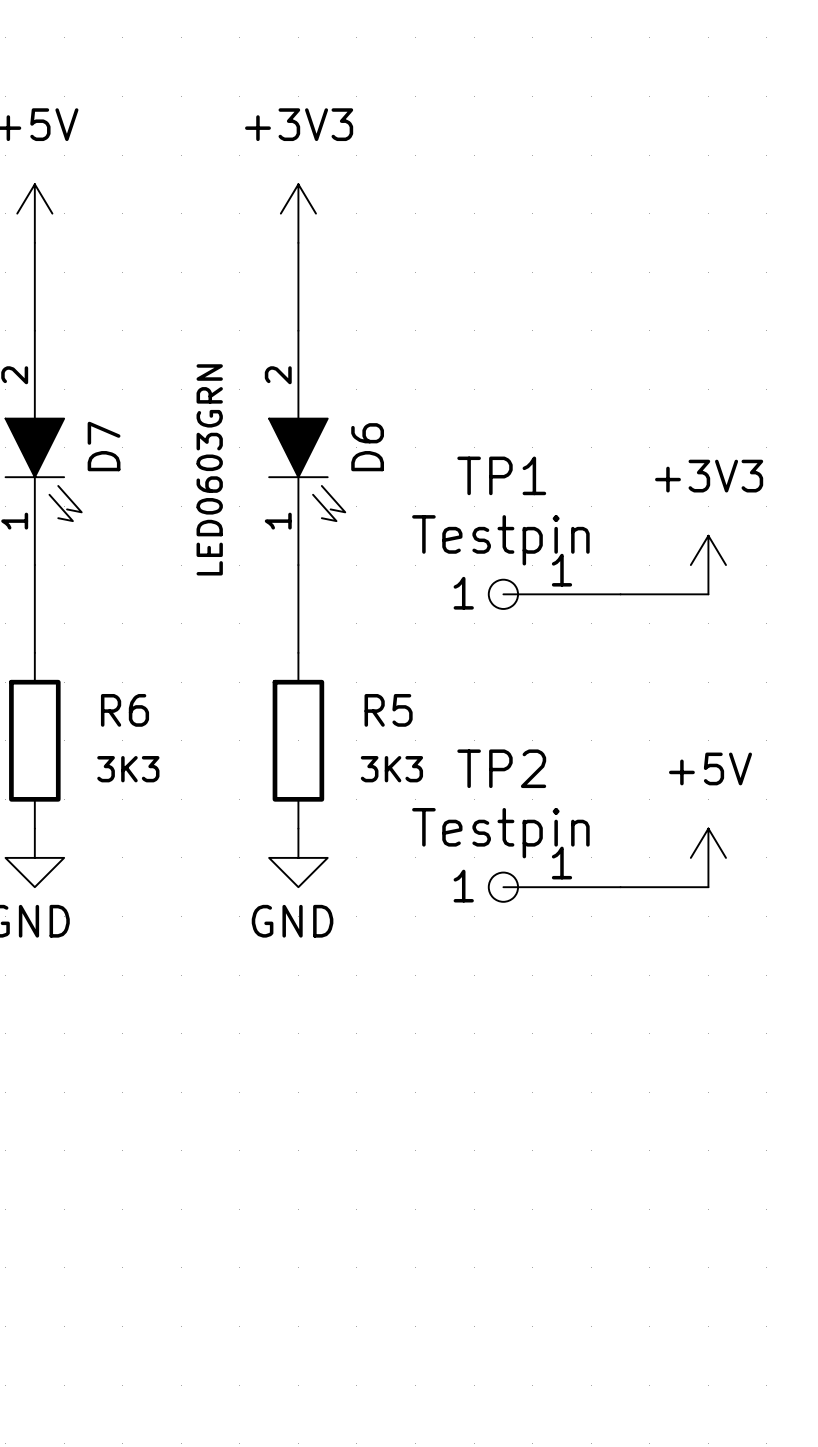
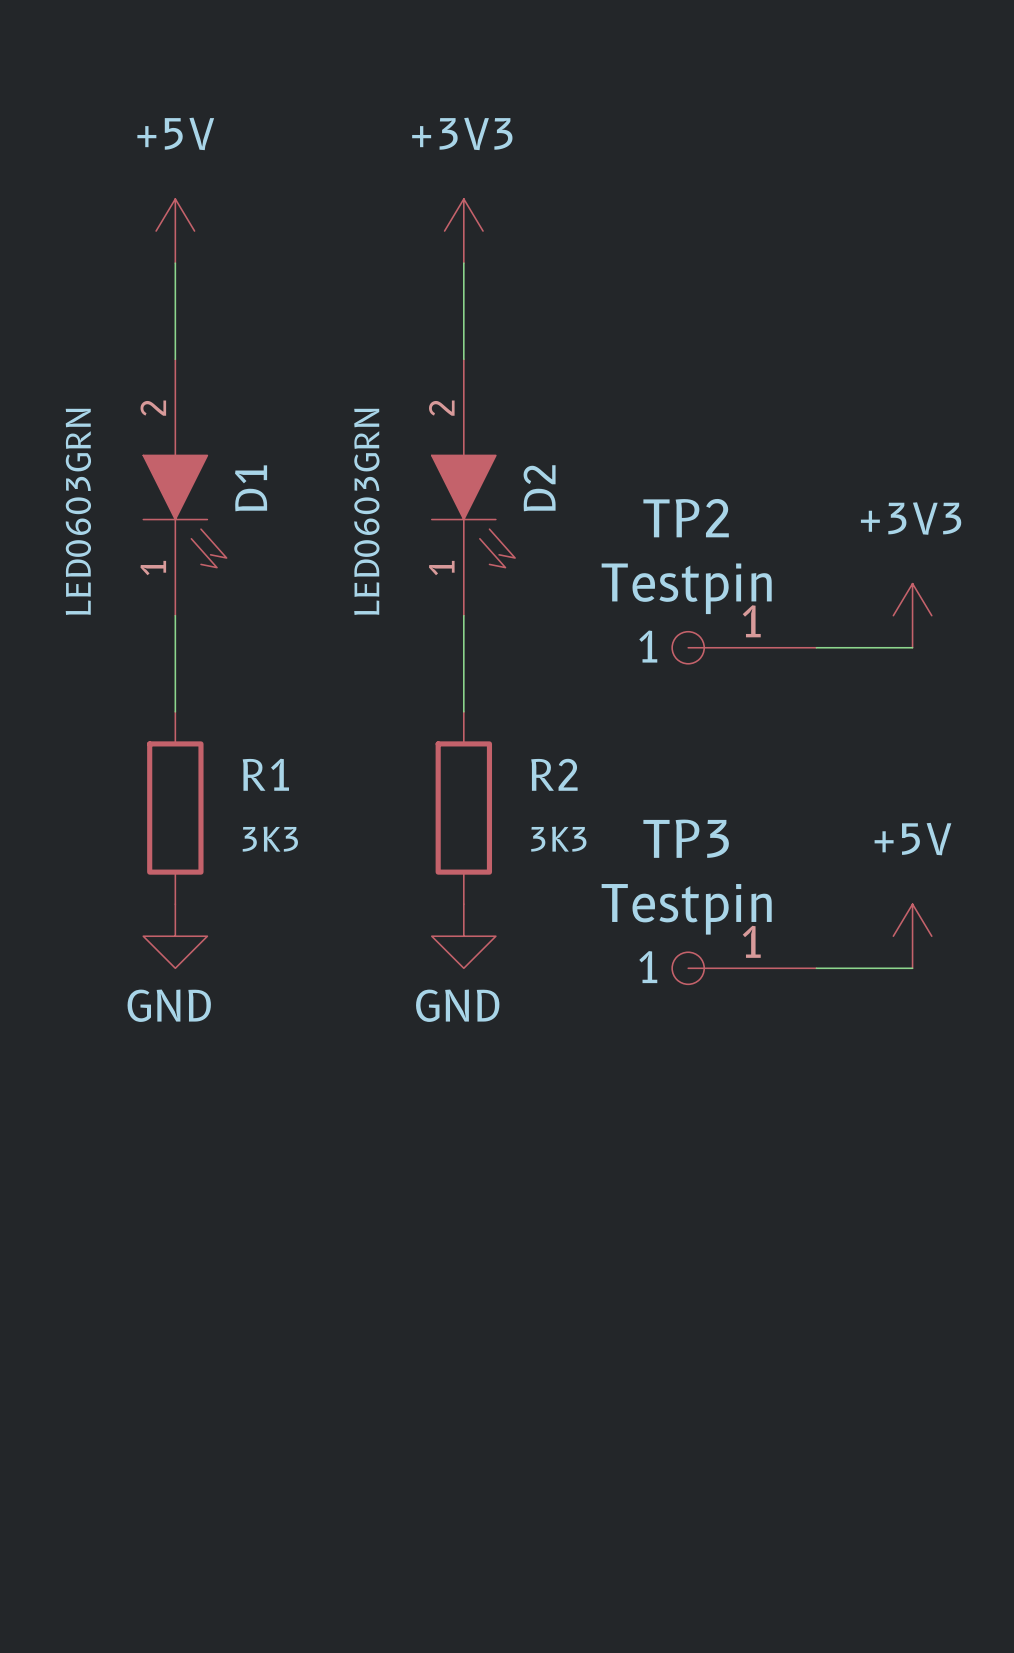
D7 name: D7 (104, 446) -> D1 (251, 488)
D6 name: D6 (367, 447) -> D2 (539, 488)
TP1 name: TP1 (501, 475) -> TP2 (686, 518)
R6 name: R6 (125, 710) -> R1 (265, 774)
R5 name: R5 (388, 710) -> R2 (554, 774)
TP2 name: TP2 (501, 768) -> TP3 (686, 838)

